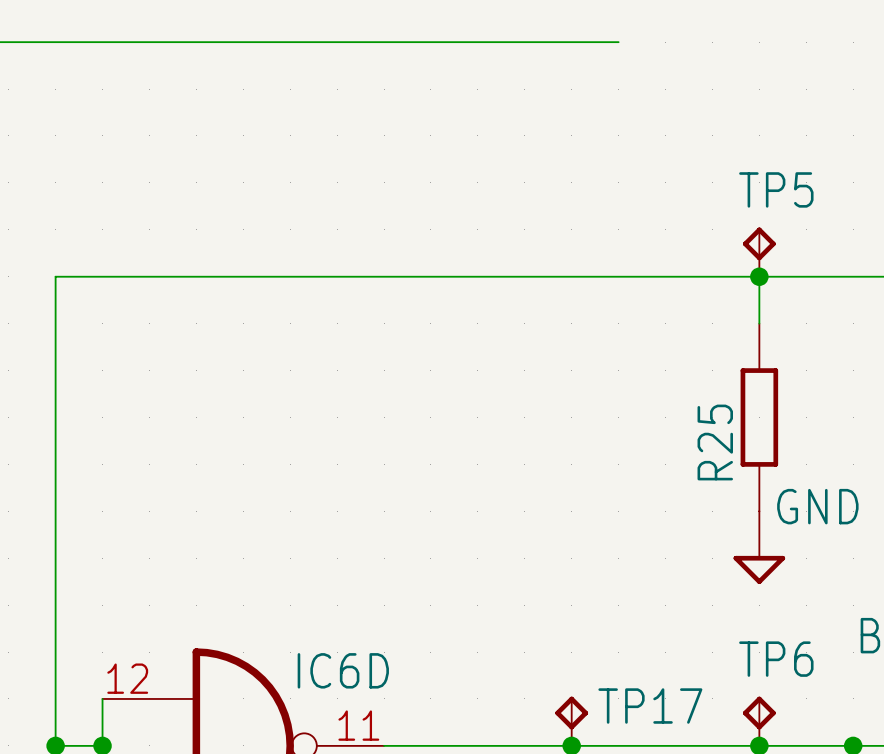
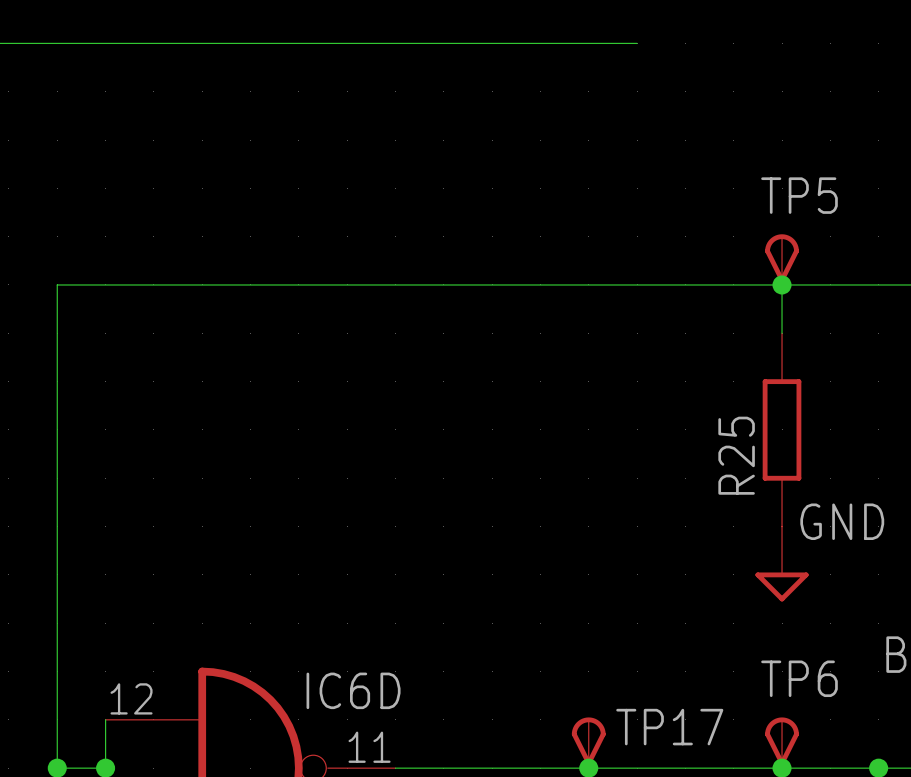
TP5 symbol: [742, 227, 776, 277] -> [765, 234, 799, 285]
TP17 symbol: [555, 696, 589, 746] -> [571, 717, 606, 769]
TP6 symbol: [742, 696, 776, 746] -> [765, 717, 799, 769]

